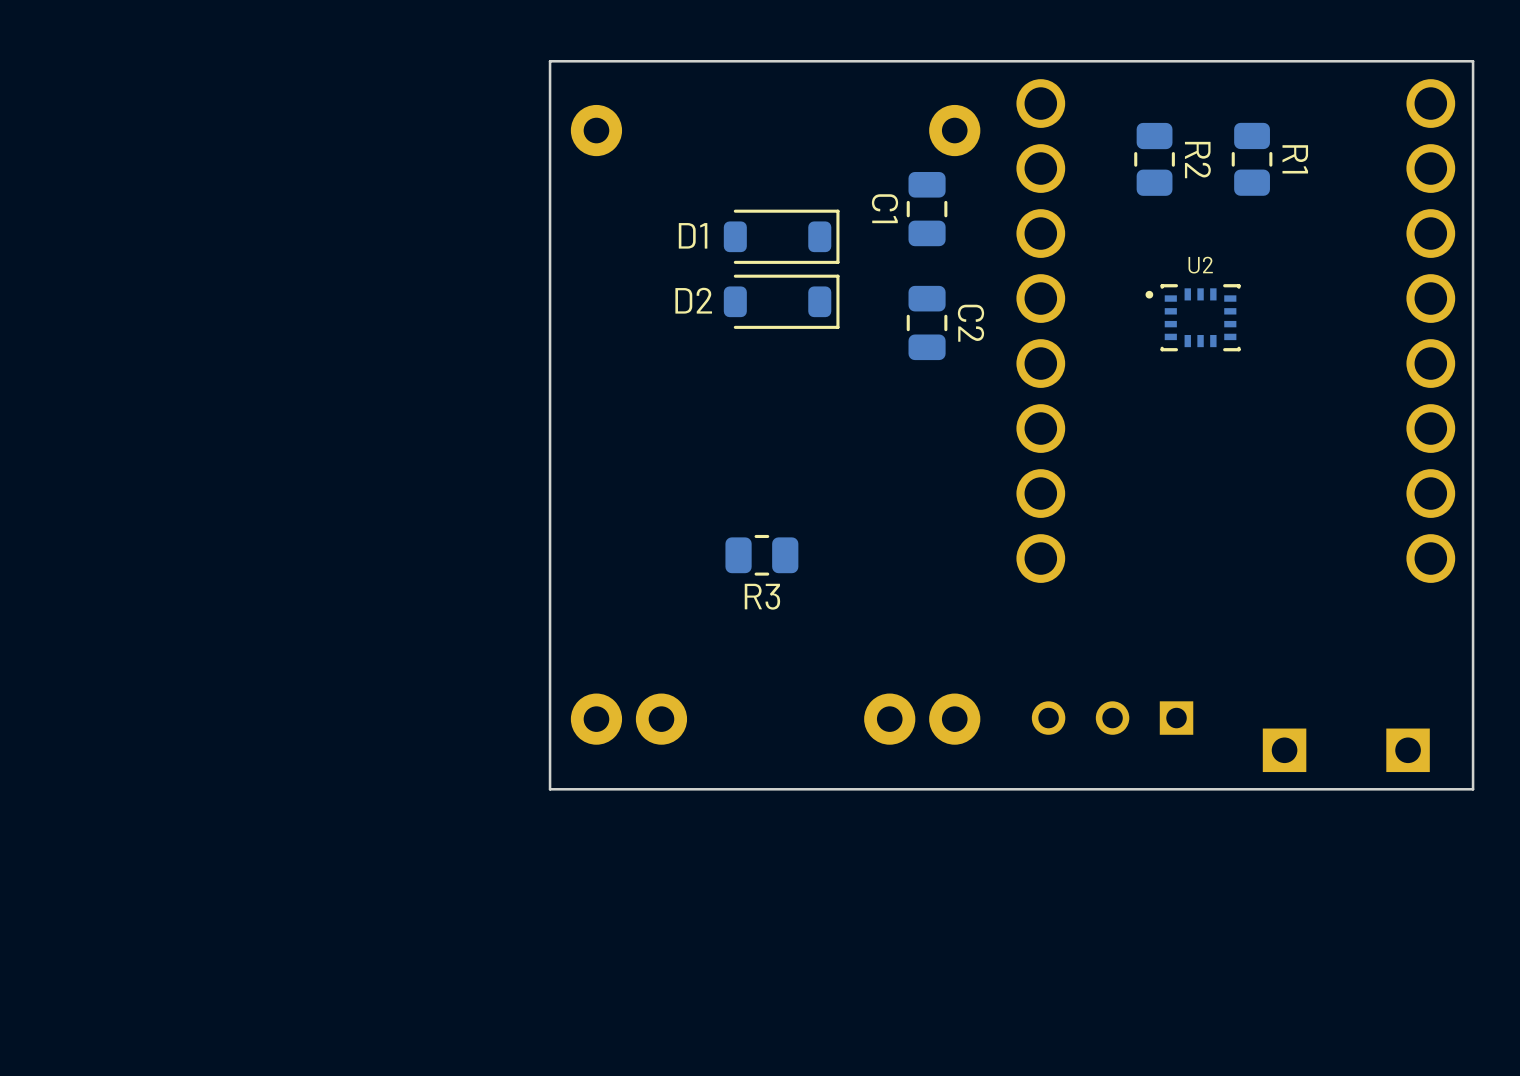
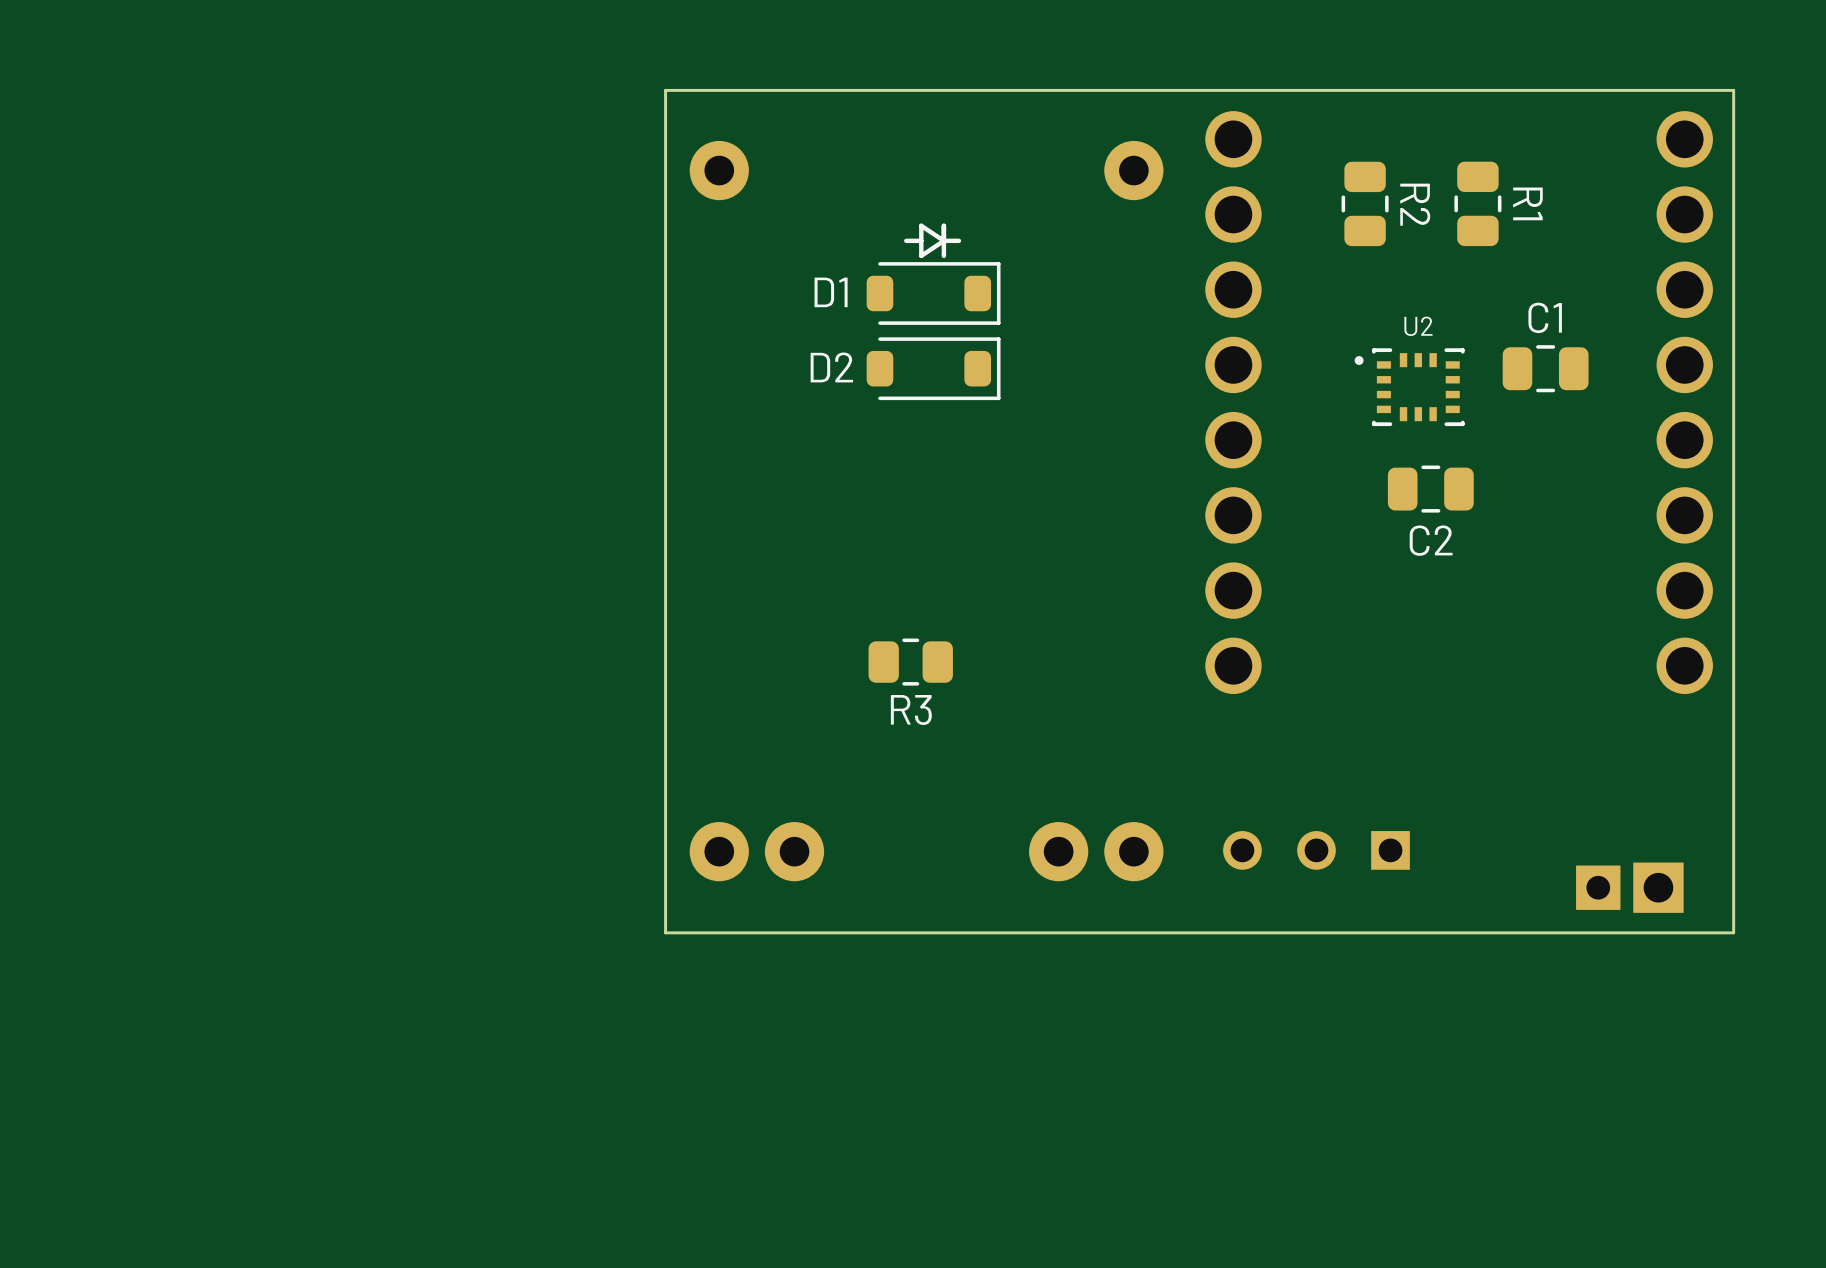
line: none -> (943, 225) (943, 255)
line: none -> (921, 240) (906, 240)
line: none -> (943, 240) (921, 225) (921, 255) (943, 240)
line: none -> (958, 240) (943, 240)
C1 rotation: 0° (927, 209) -> 90° clockwise (1545, 368)
C1 position: (927, 209) -> (1545, 368)
C2 rotation: 0° (927, 322) -> 90° clockwise (1430, 489)
C2 position: (927, 322) -> (1430, 489)
part: (1284, 750) -> none
part: none -> (1598, 887)

